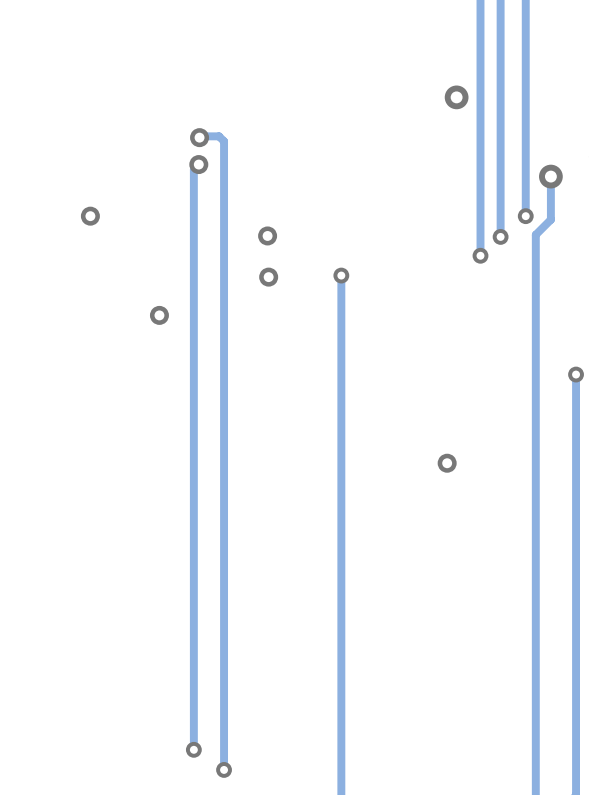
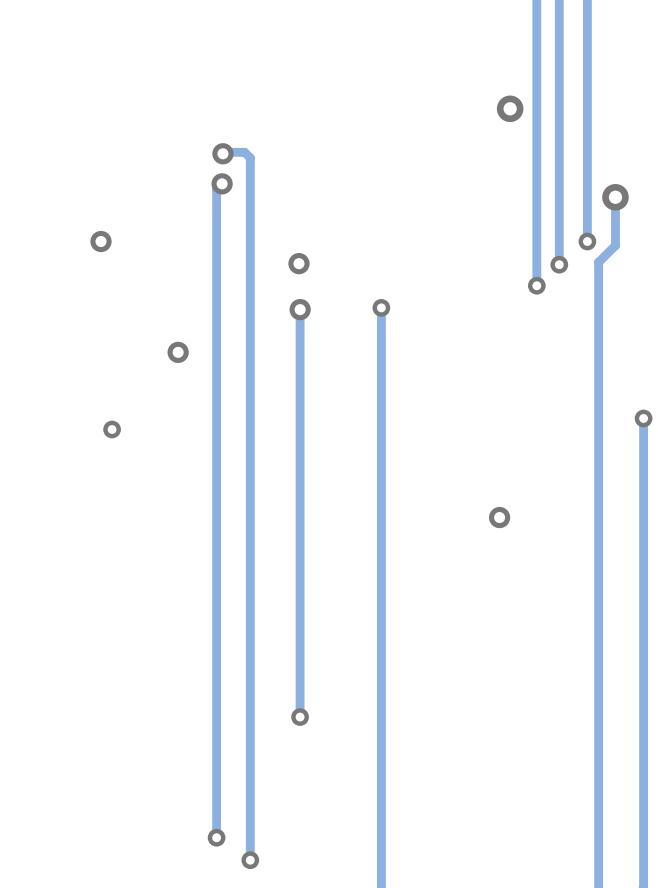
track: none -> (300, 309) (300, 717)
via: none -> (112, 429)
via: none -> (300, 717)

